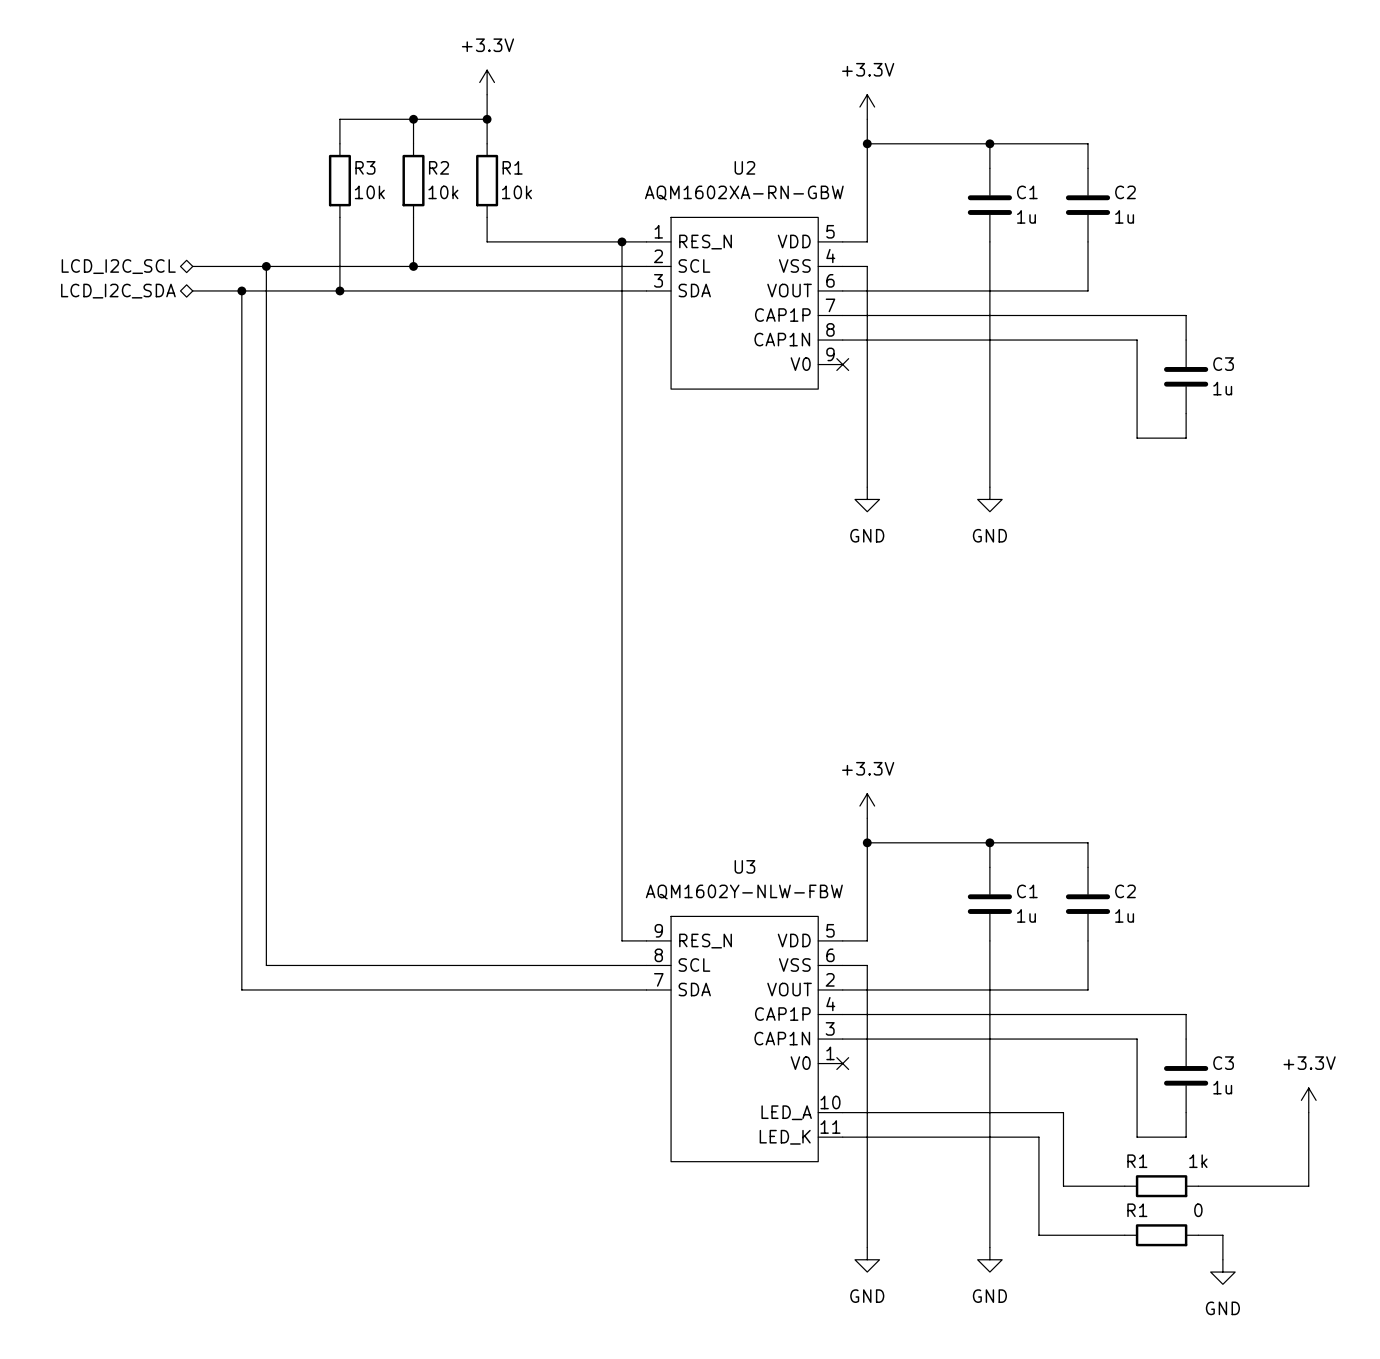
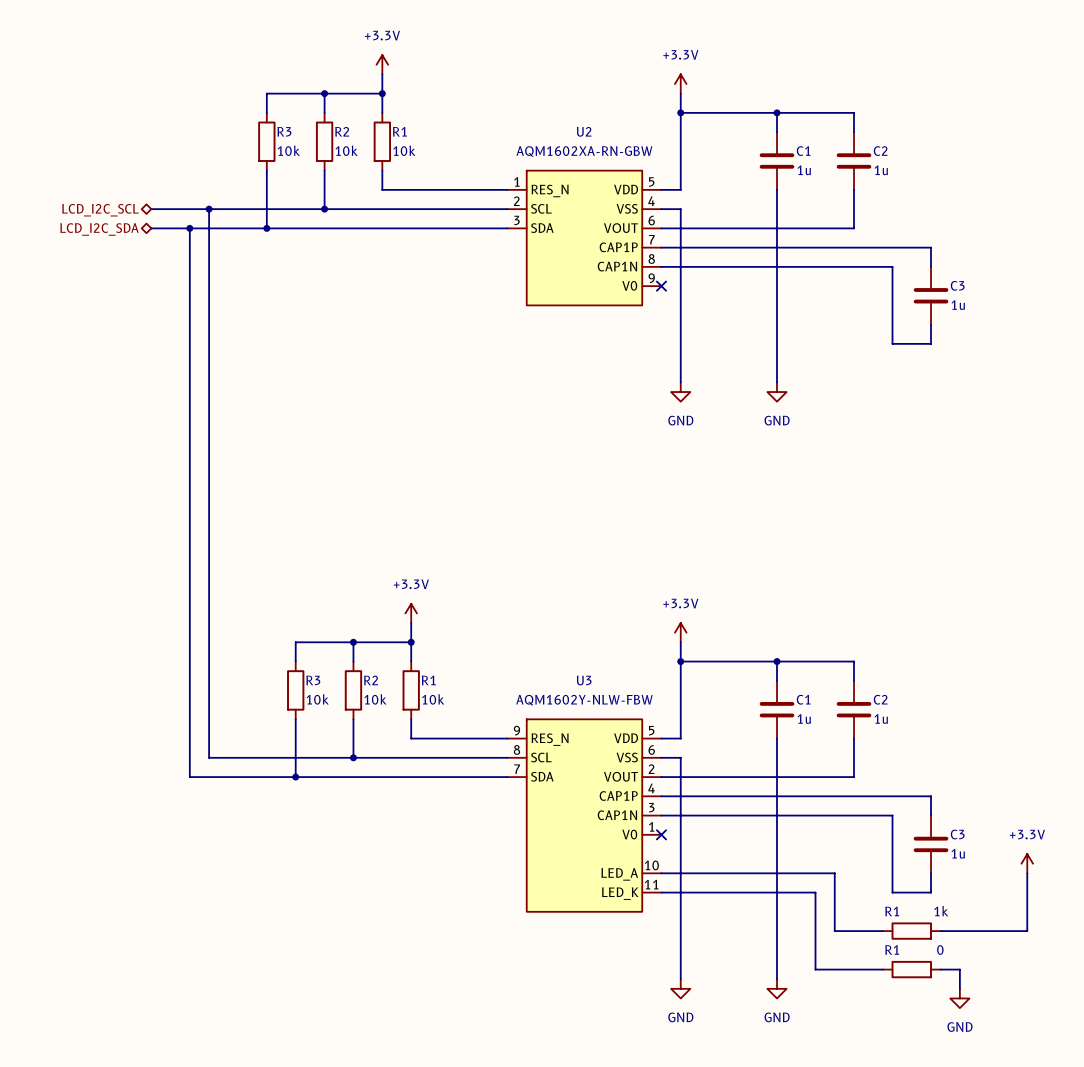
wire: (622, 241) (622, 940) -> (411, 719) (411, 738) (488, 738)
junction: (622, 241) -> none
power symbol: none -> +3.3V (411, 613)
wire: none -> (411, 623) (411, 661)
wire: none -> (353, 642) (353, 661)
junction: none -> (353, 642)
wire: none -> (411, 642) (295, 642) (295, 661)
junction: none -> (411, 642)
R3: none -> 10k (295, 690)
R2: none -> 10k (353, 690)
R1: none -> 10k (411, 690)
wire: none -> (295, 719) (295, 777)
wire: none -> (353, 719) (353, 757)
junction: none -> (353, 757)
junction: none -> (295, 777)

